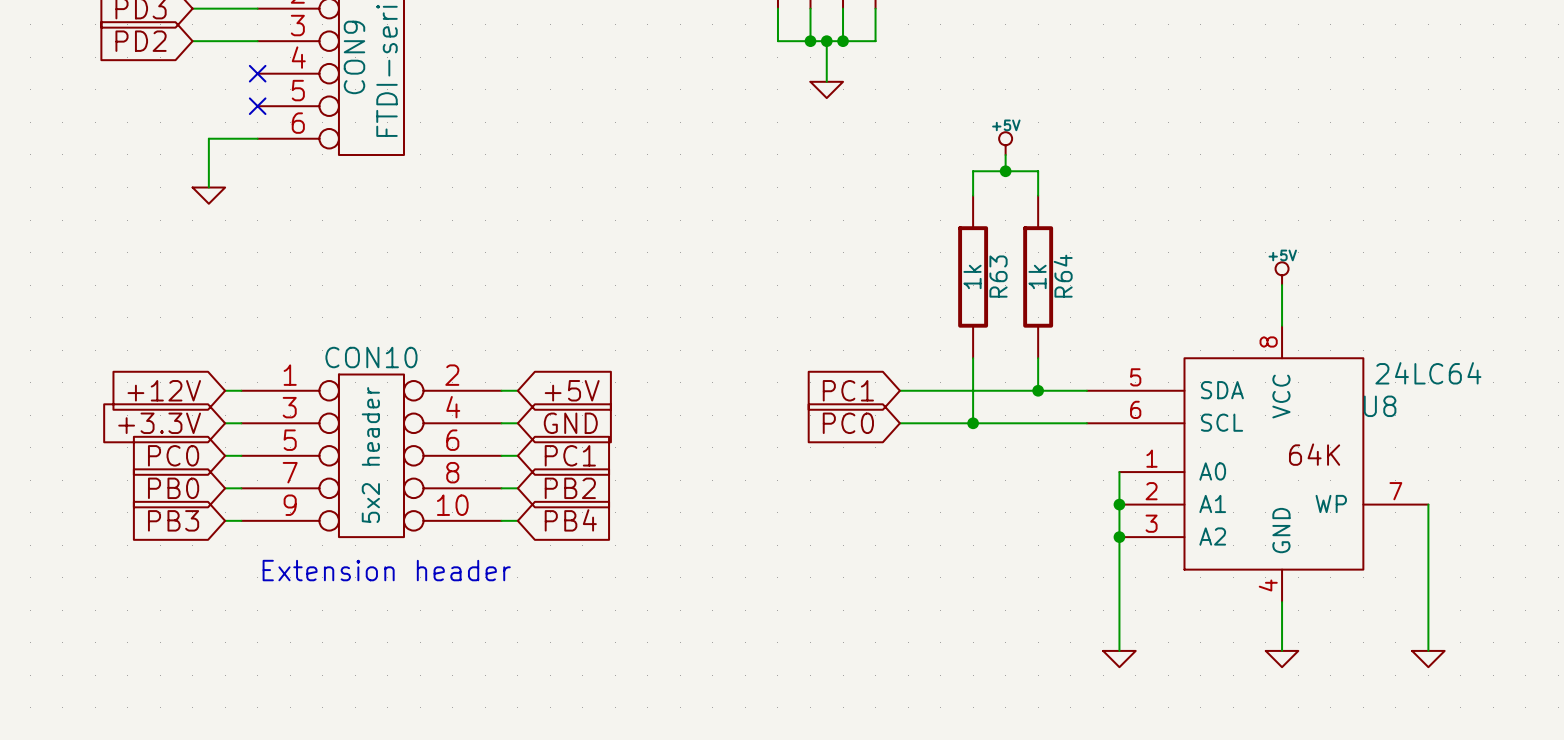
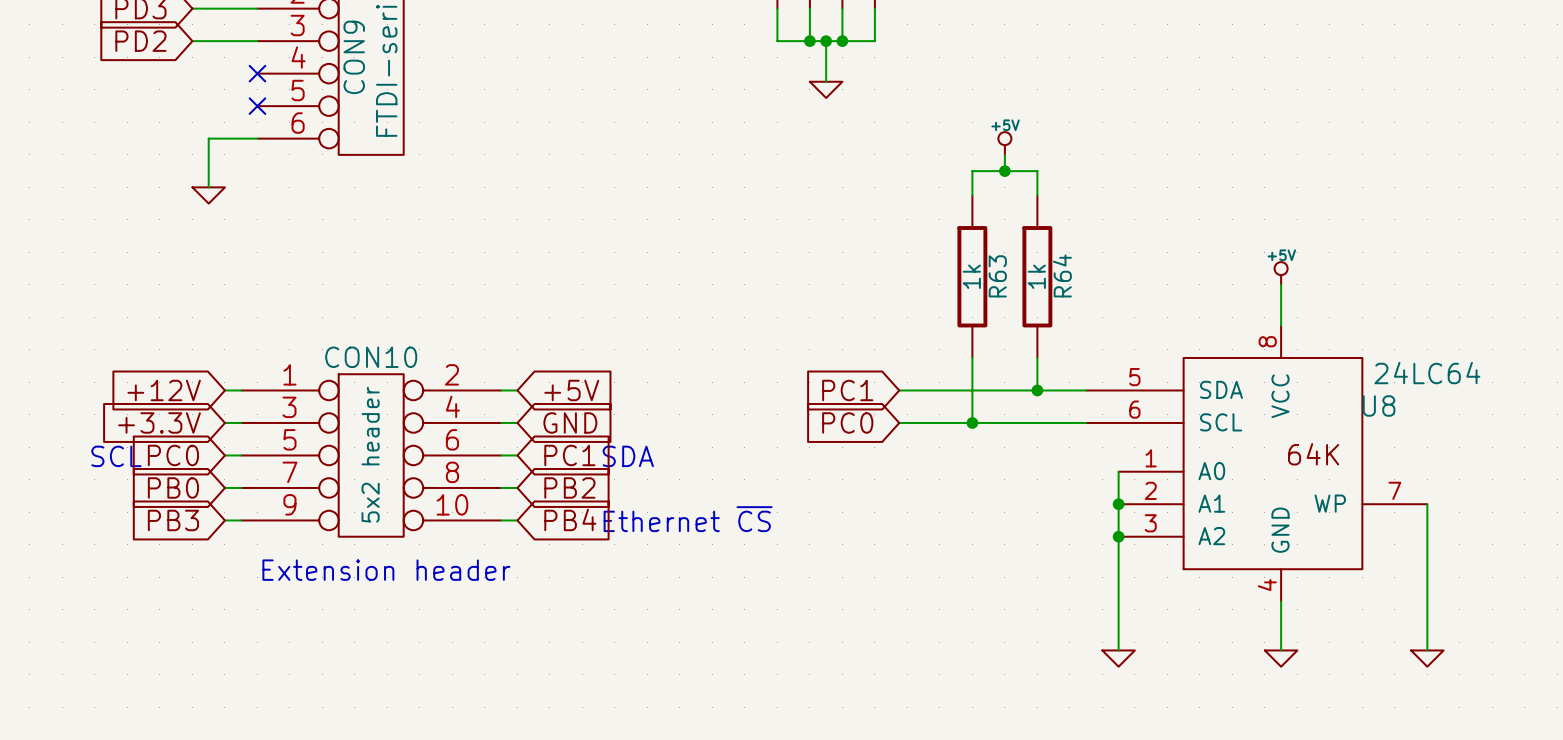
text: none -> SCL (116, 456)
text: none -> SDA (628, 456)
text: none -> Ethernet ~{CS} (688, 519)

